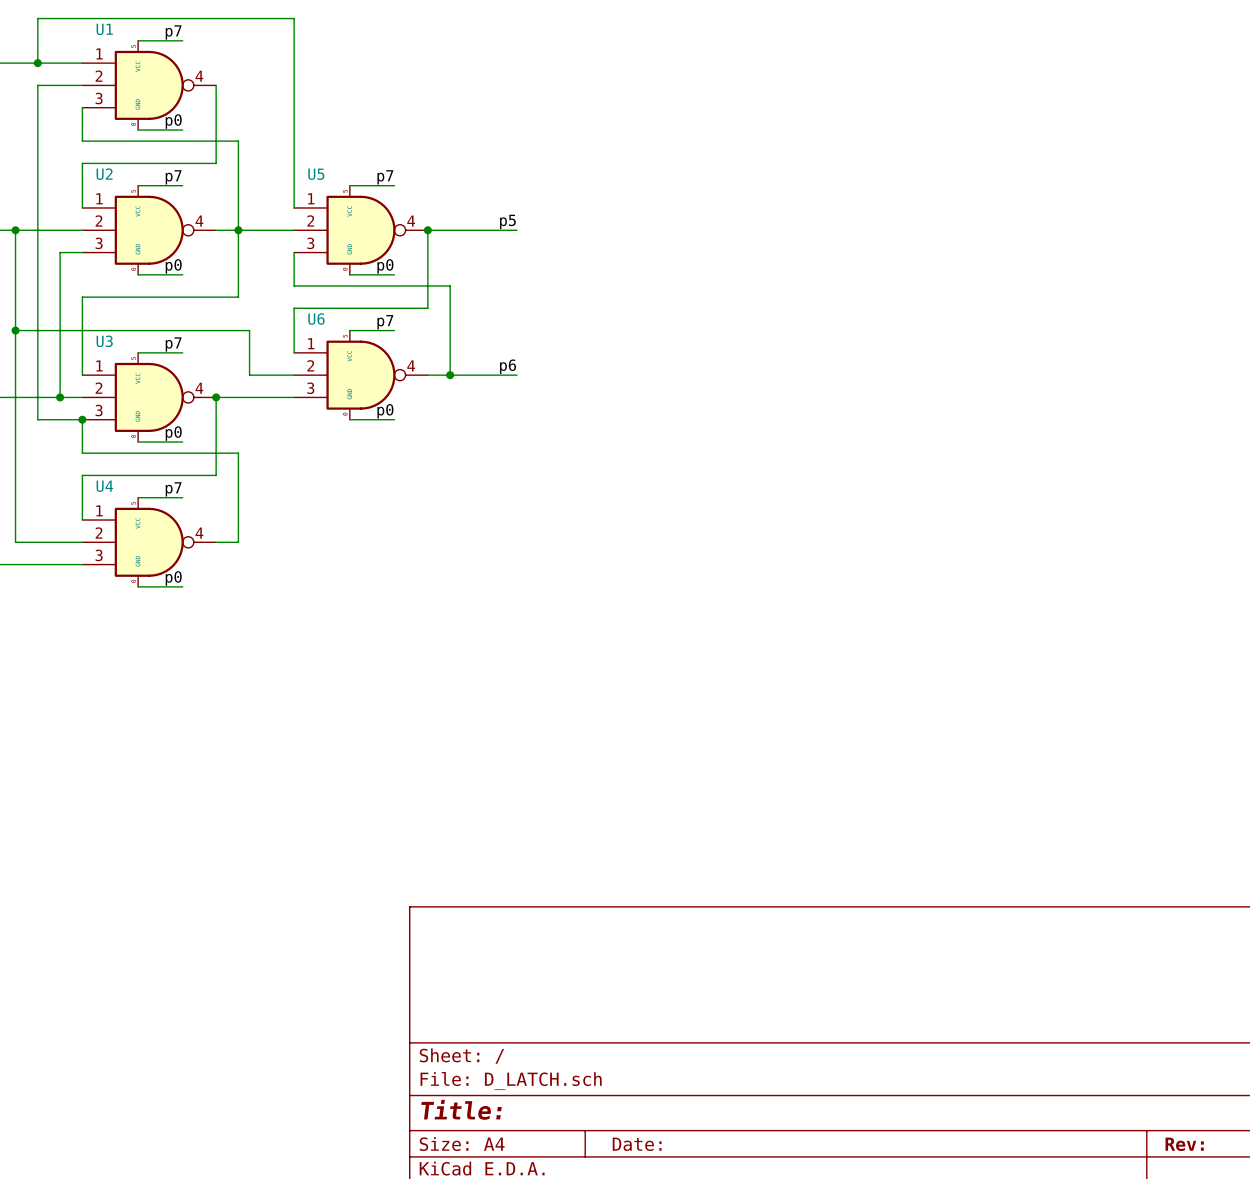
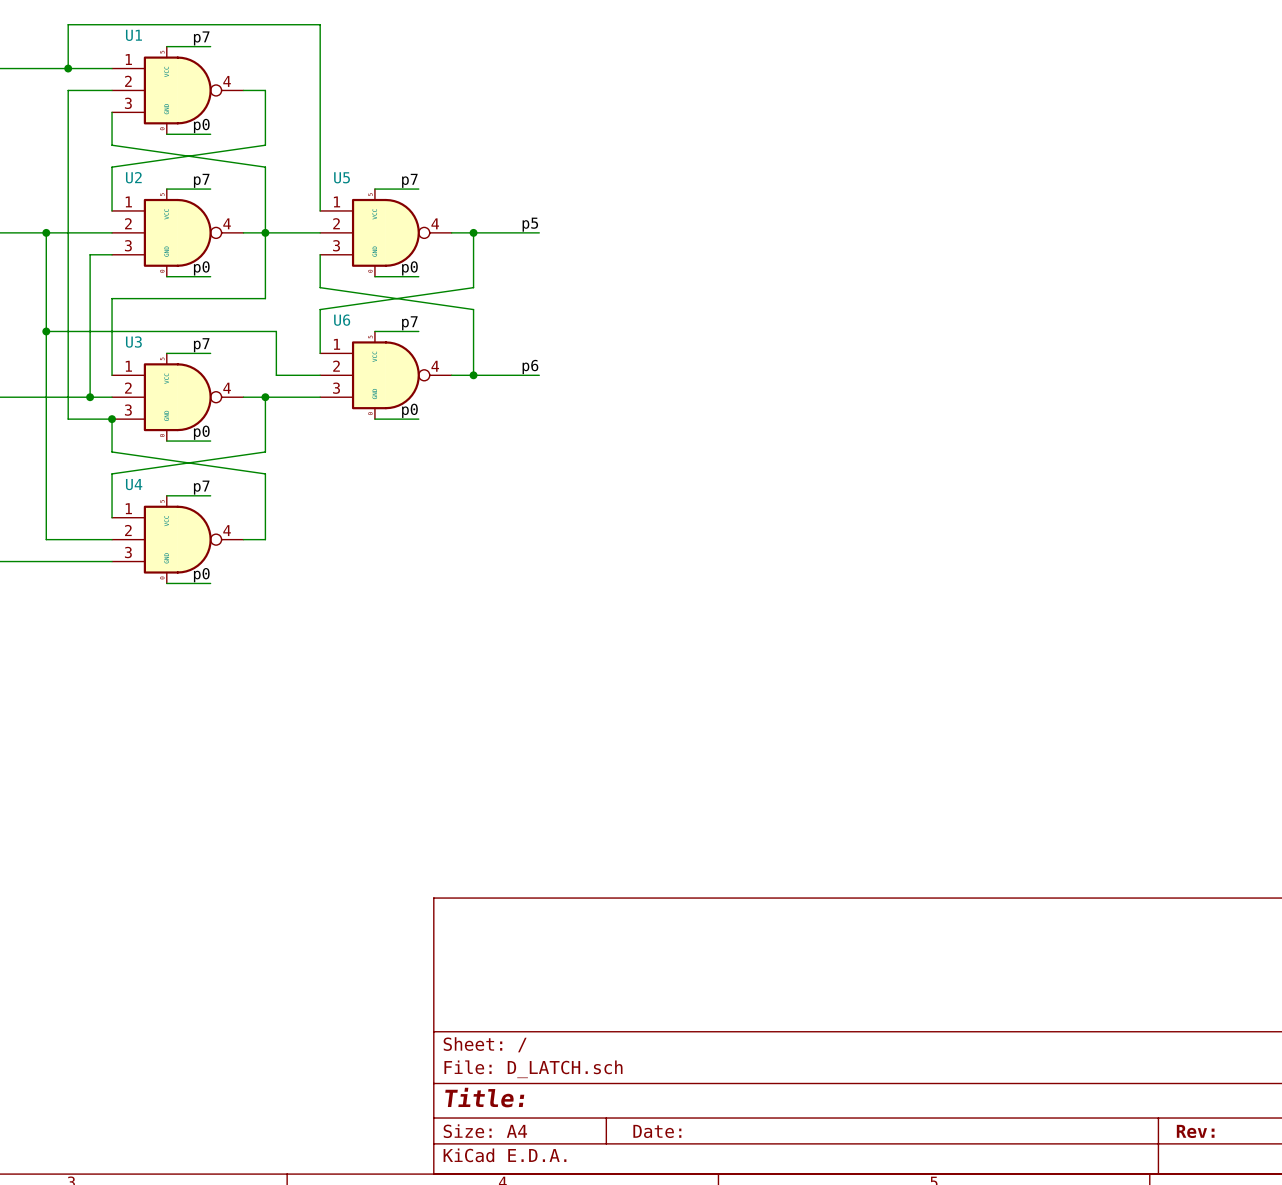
wire: (216, 85) (216, 163) (82, 163) -> (243, 90) (265, 90) (265, 145) (112, 167)
wire: (82, 141) (238, 141) (238, 163) -> (112, 145) (265, 167)
wire: (427, 230) (427, 308) (294, 308) -> (473, 232) (473, 287) (320, 309)
junction position: (427, 230) -> (473, 232)
wire: (294, 285) (450, 285) (450, 308) -> (320, 287) (473, 309)
wire: (216, 397) (216, 475) (82, 475) -> (265, 397) (265, 451) (112, 473)
junction position: (216, 397) -> (265, 397)
wire: (82, 453) (238, 453) (238, 475) -> (112, 451) (265, 473)

